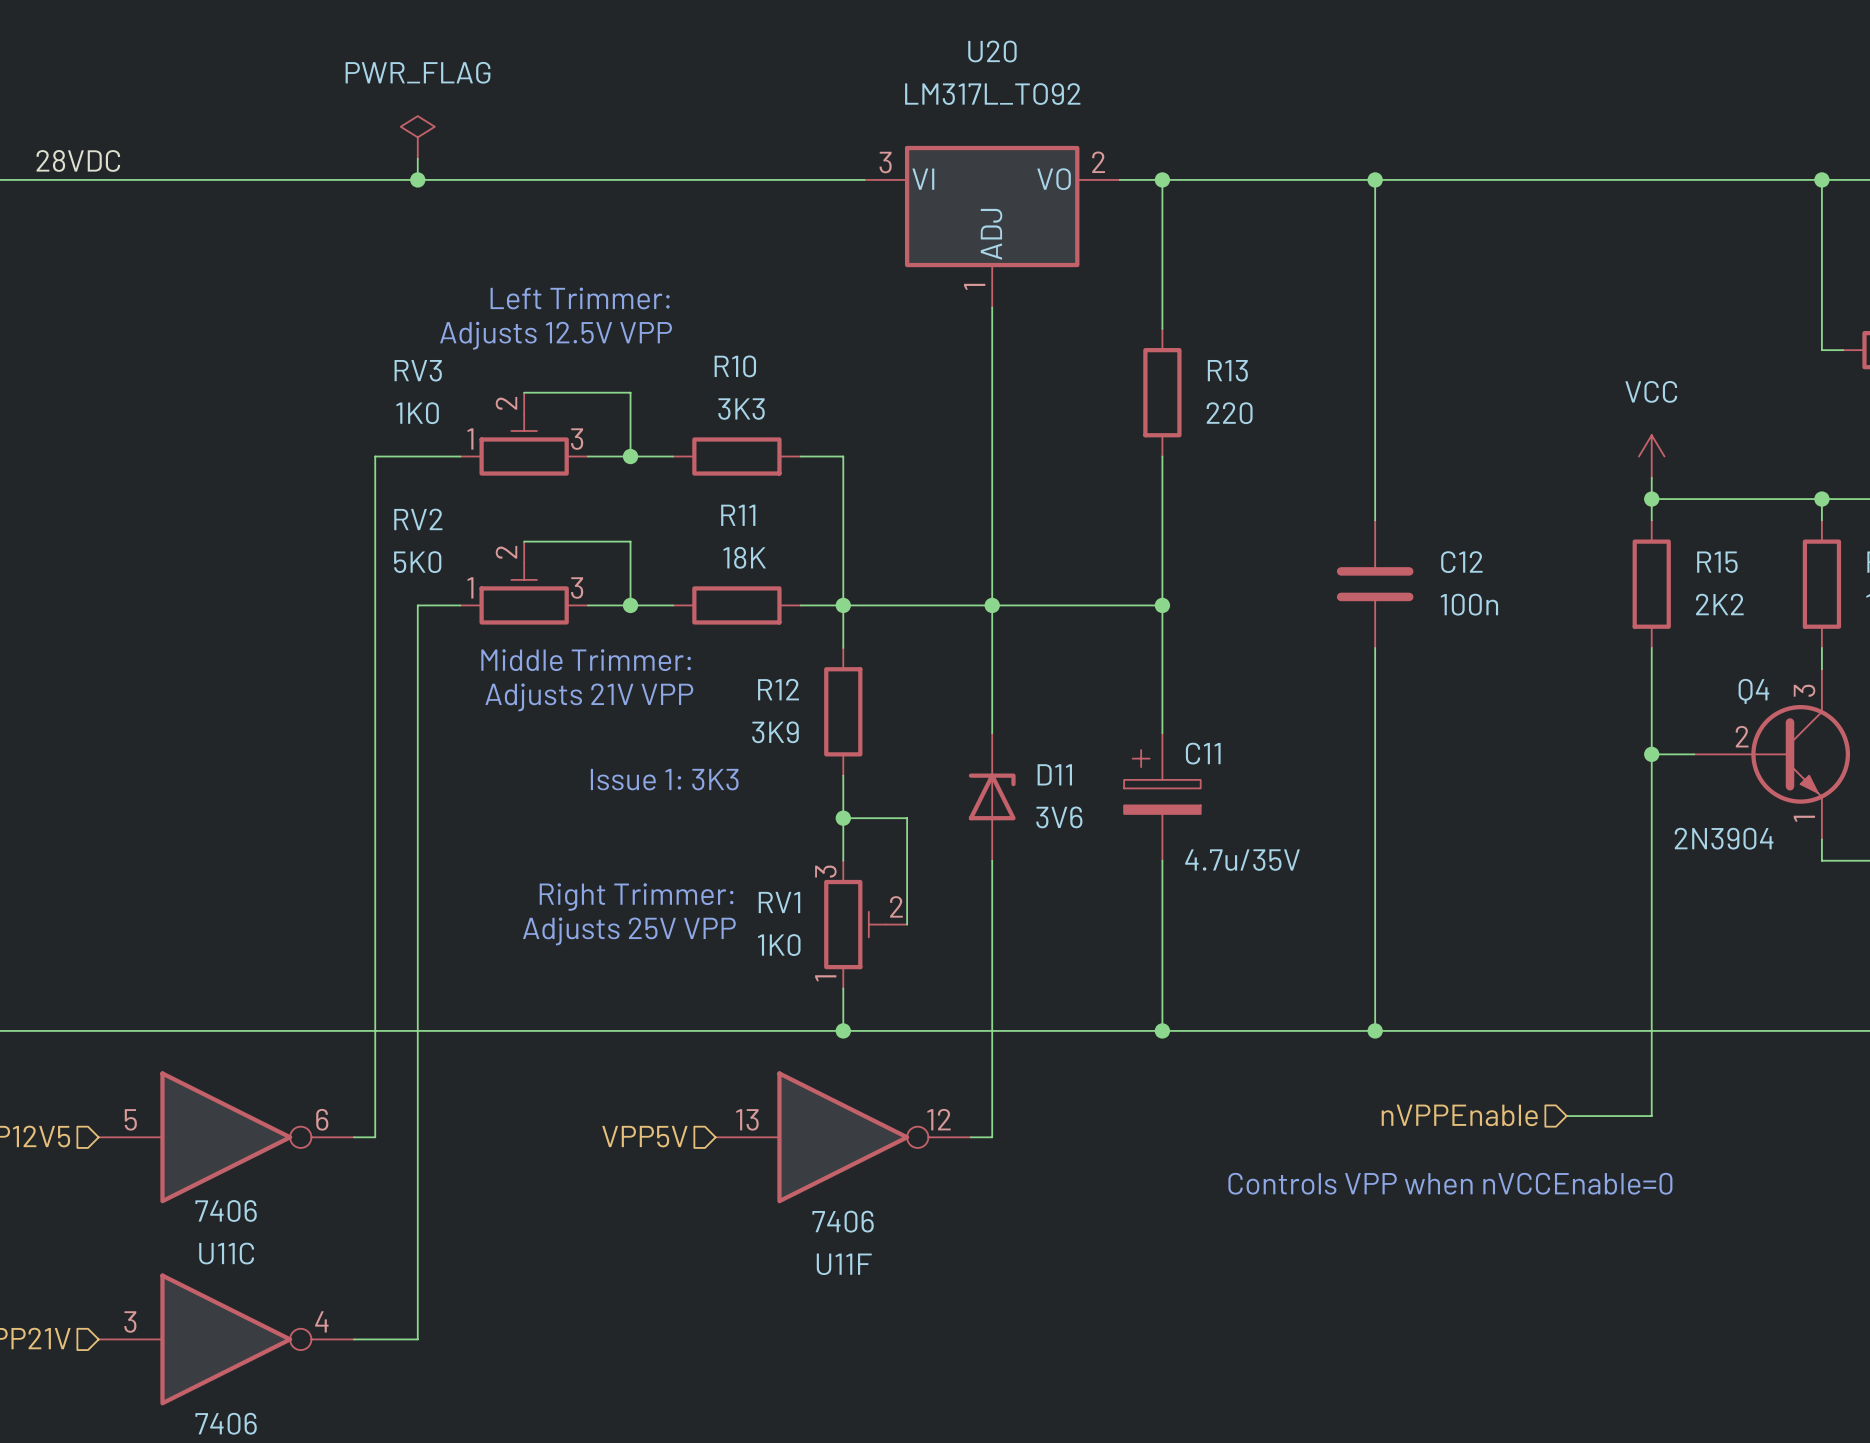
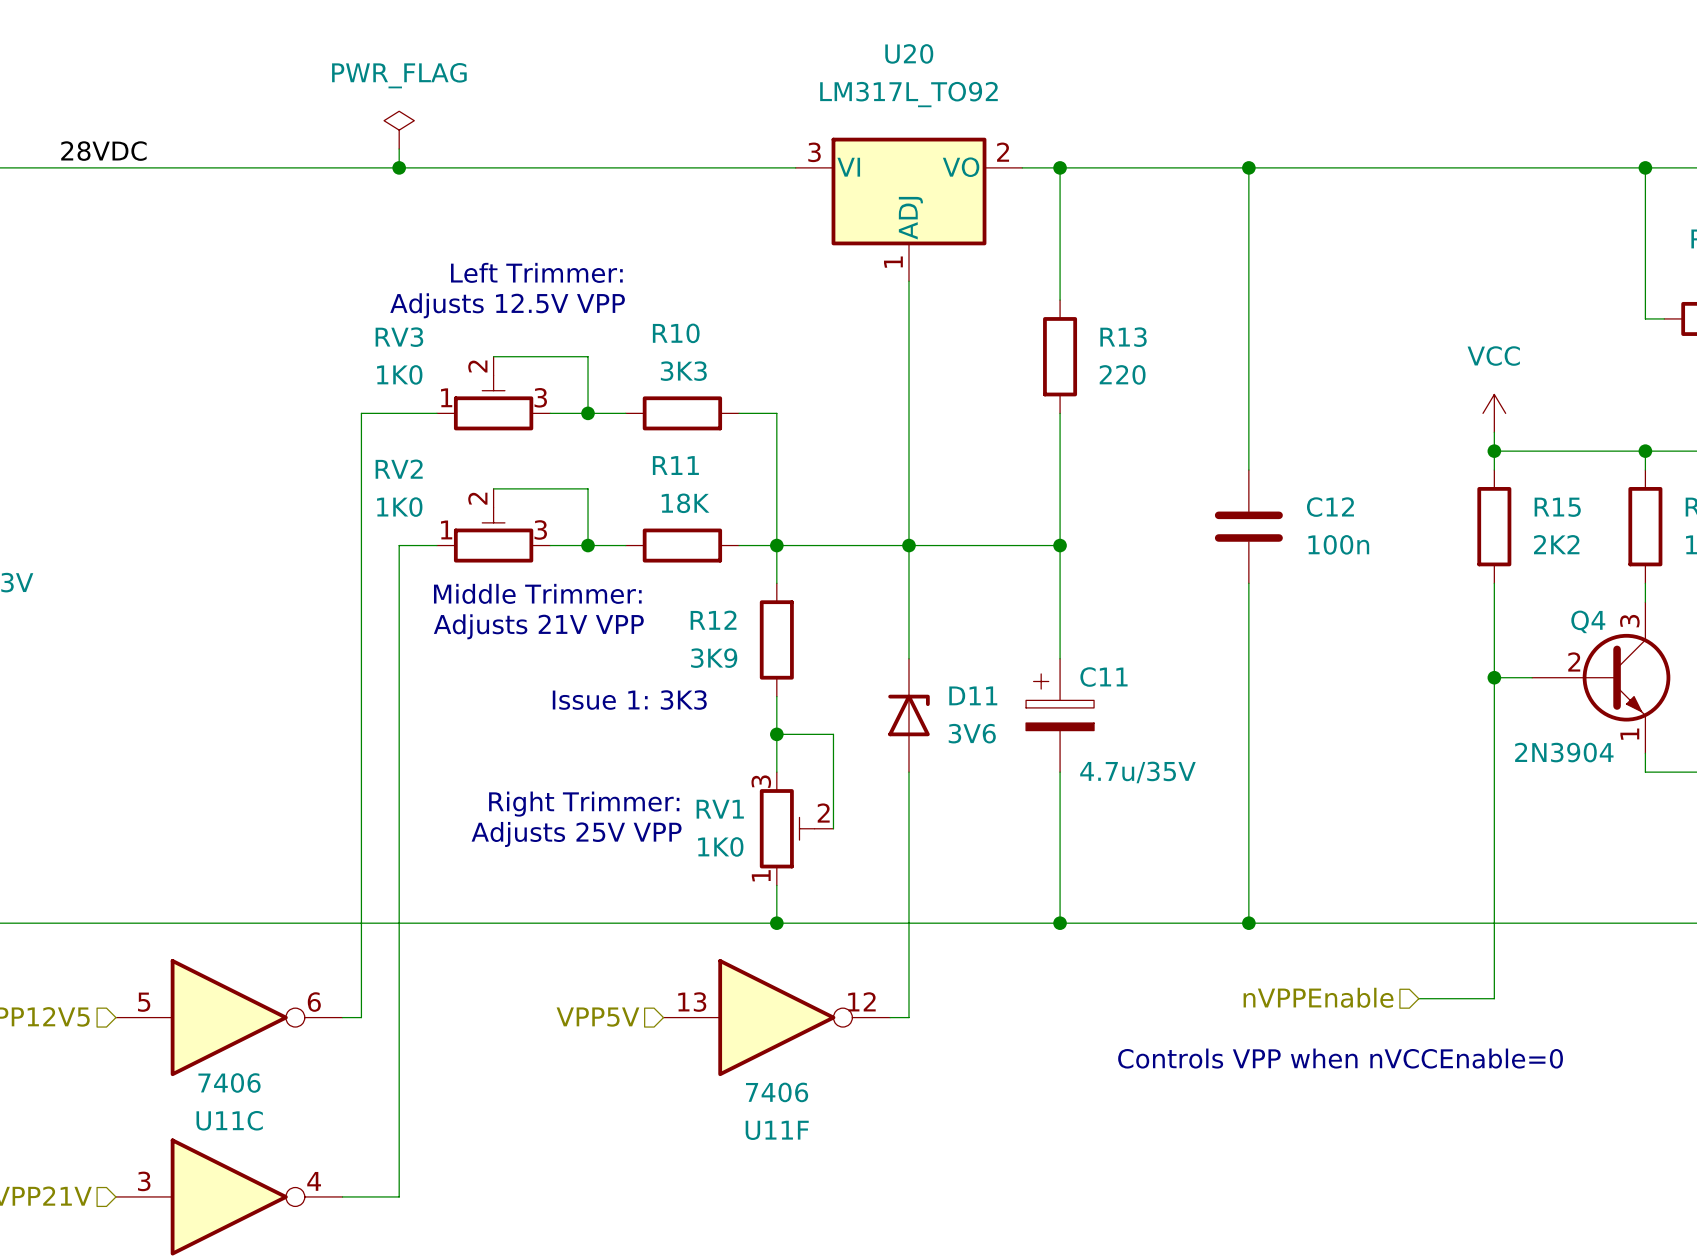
RV2 value: 5K0 (417, 562) -> 1K0 (399, 507)

